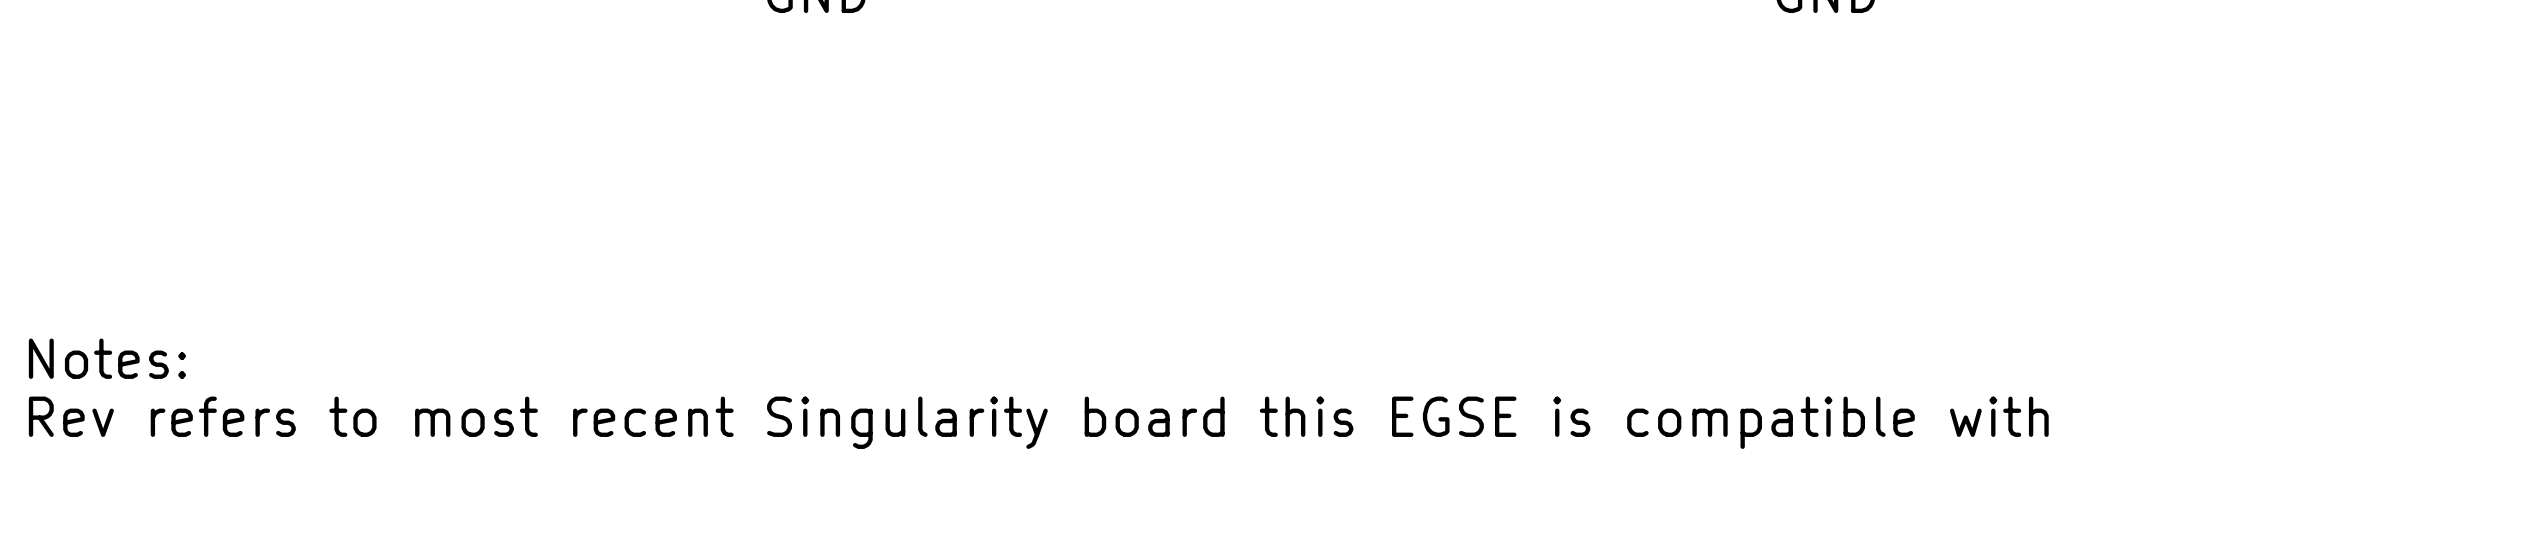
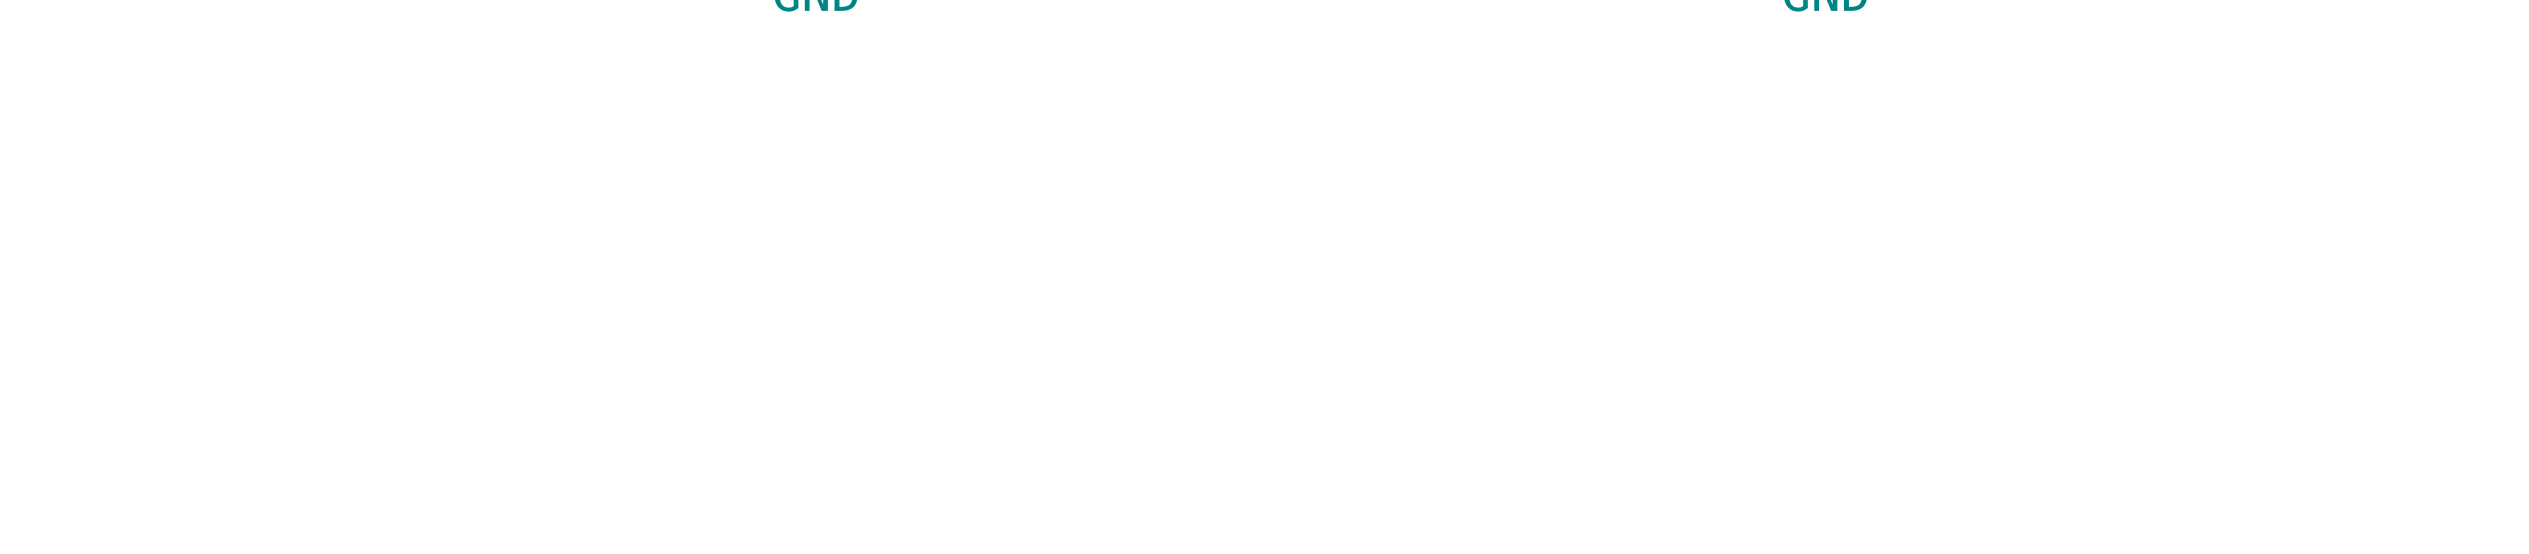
text: Notes: (107, 358) -> none
text: Rev refers to most recent Singularity board this EGSE is compatible with (1038, 422) -> none

